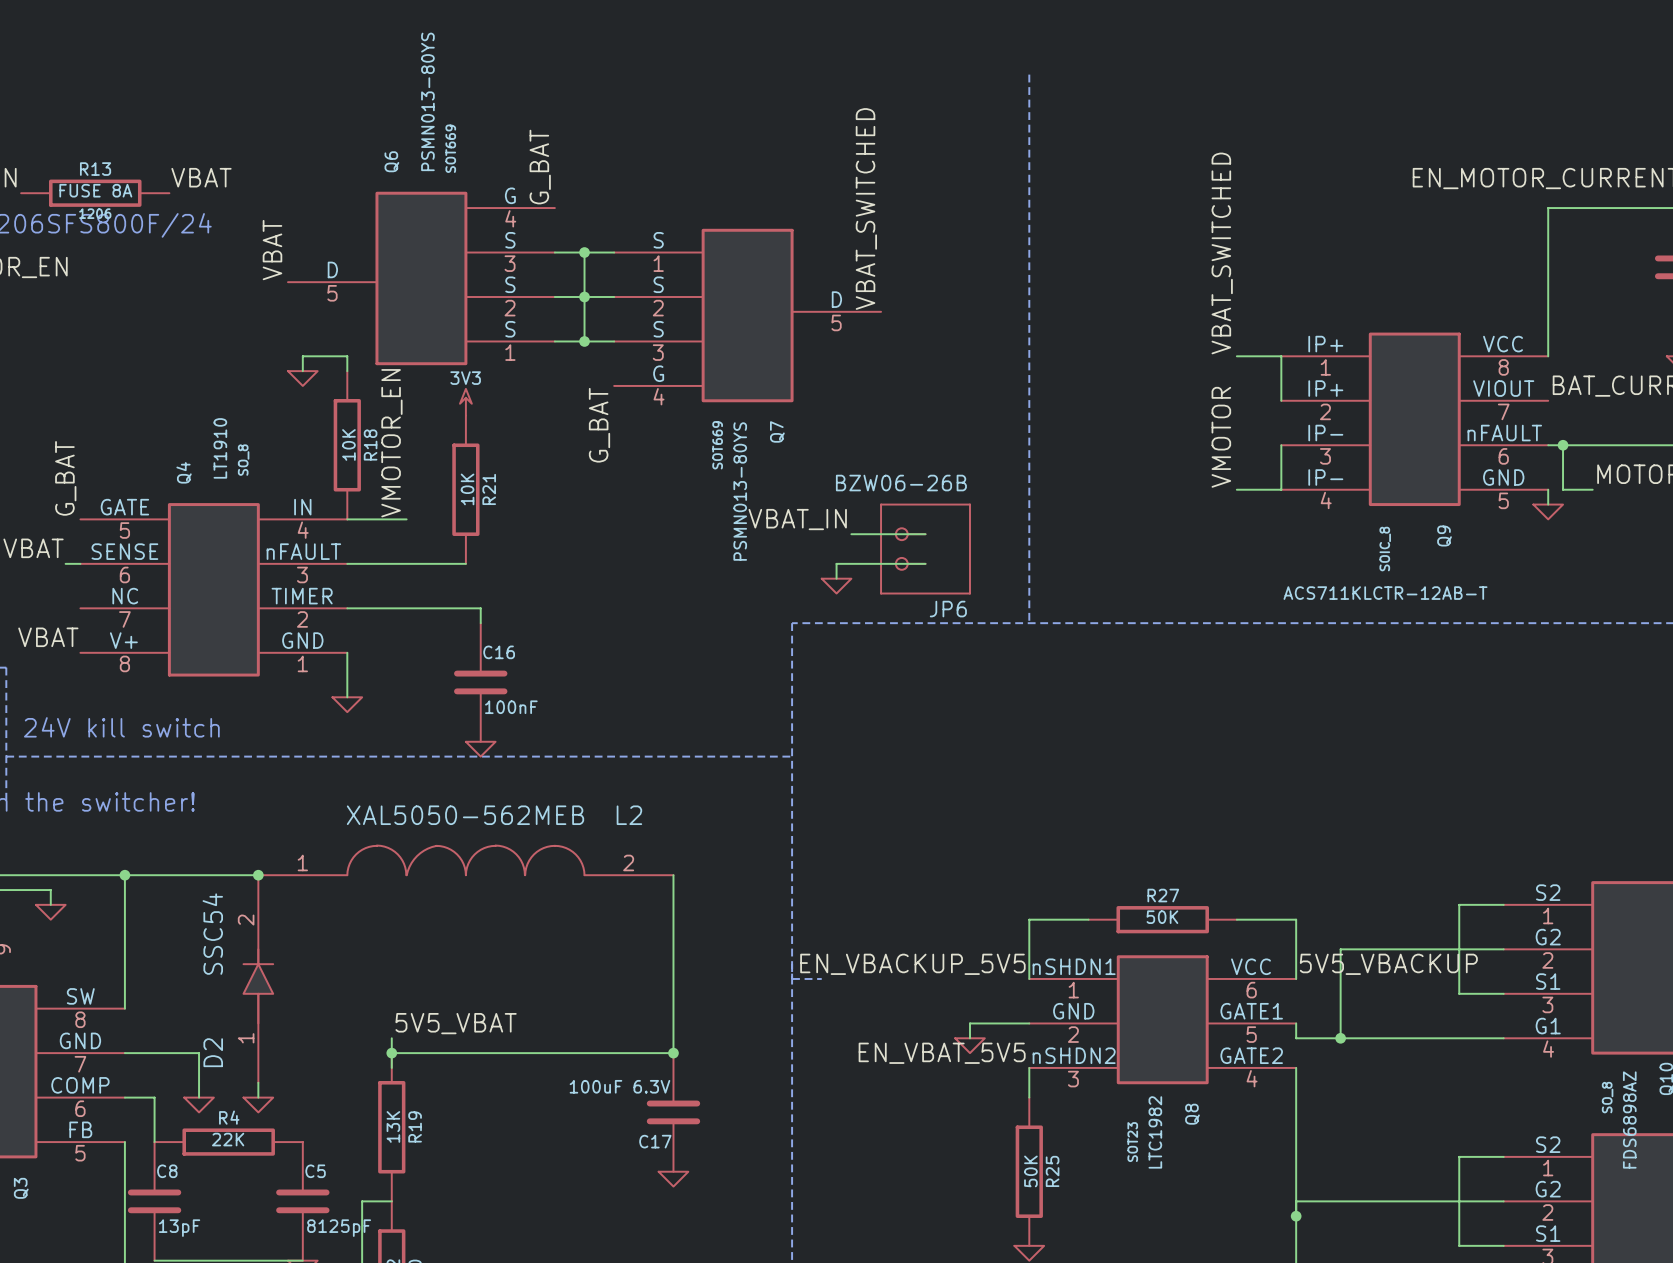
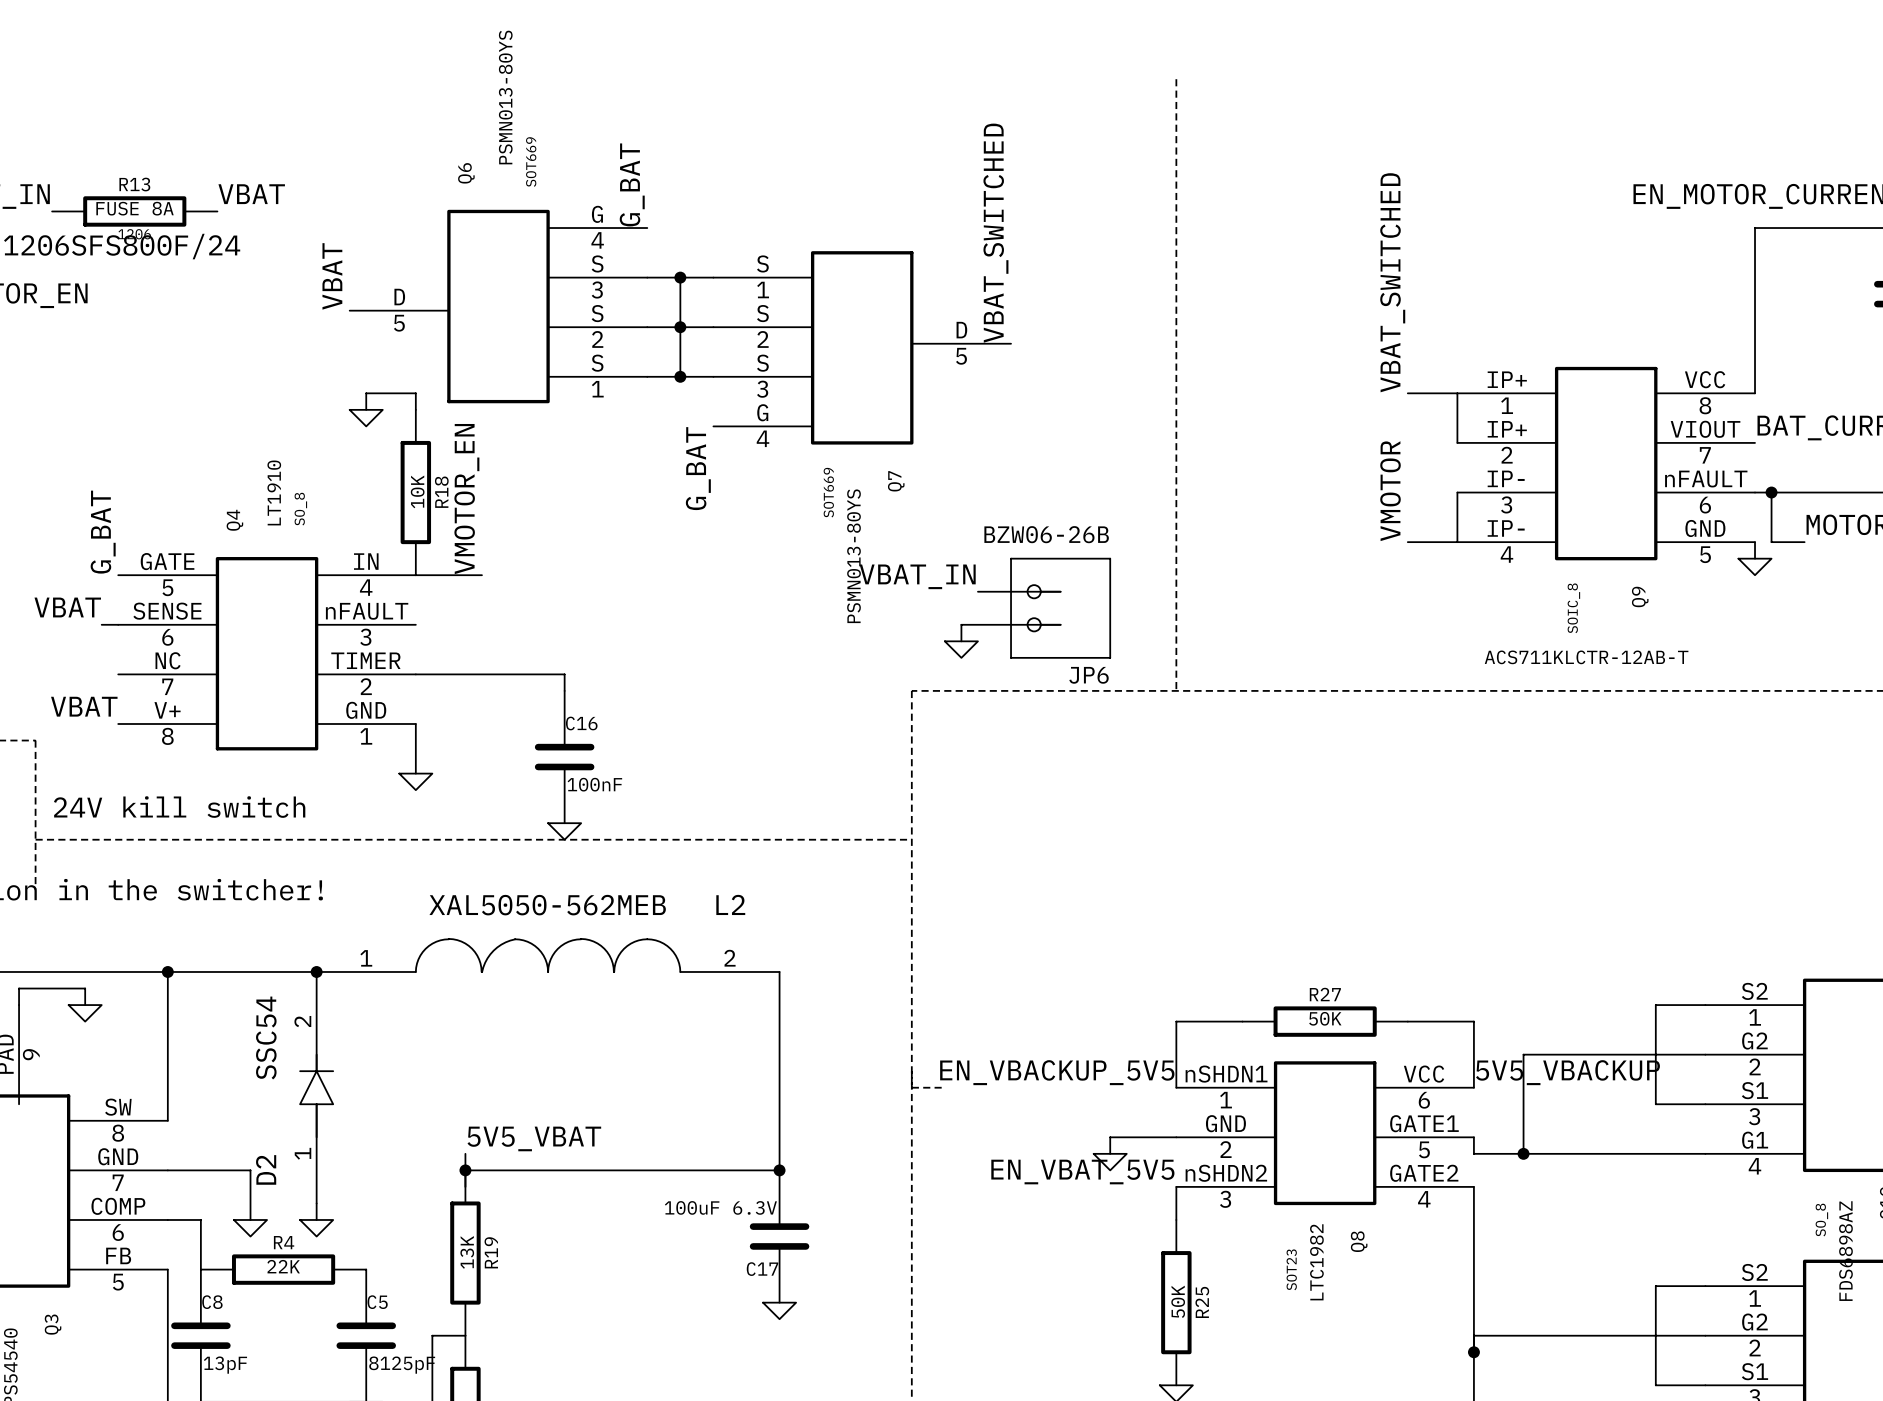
power symbol: 3V3 (465, 402) -> none
R21: 10K (465, 489) -> none
wire: (347, 563) (465, 563) -> none

